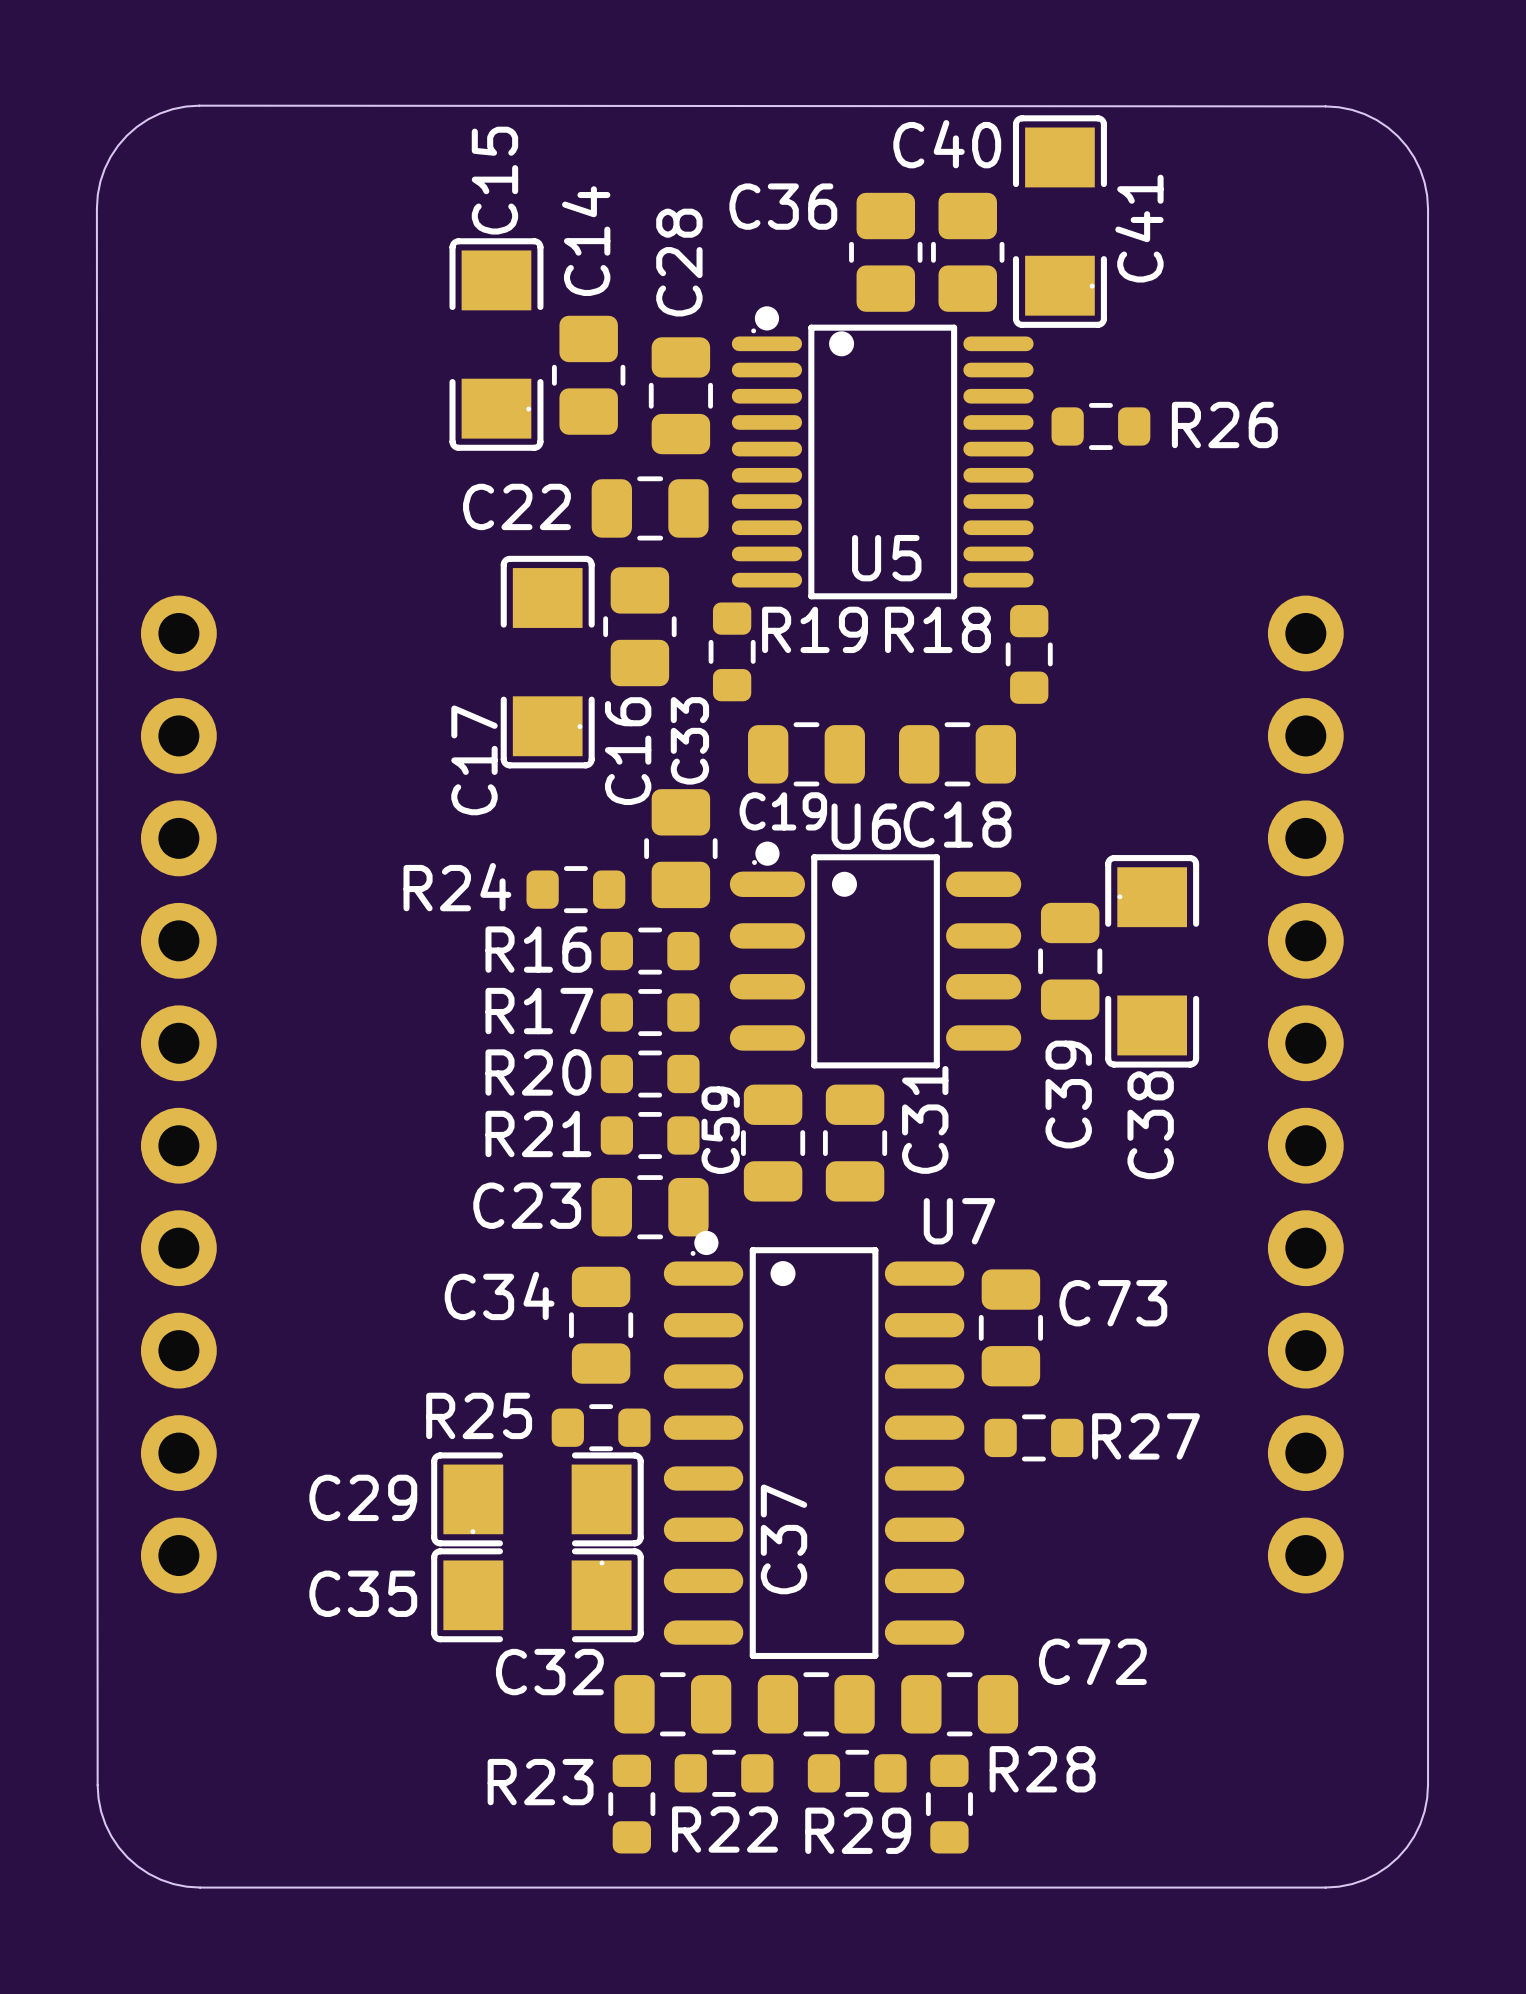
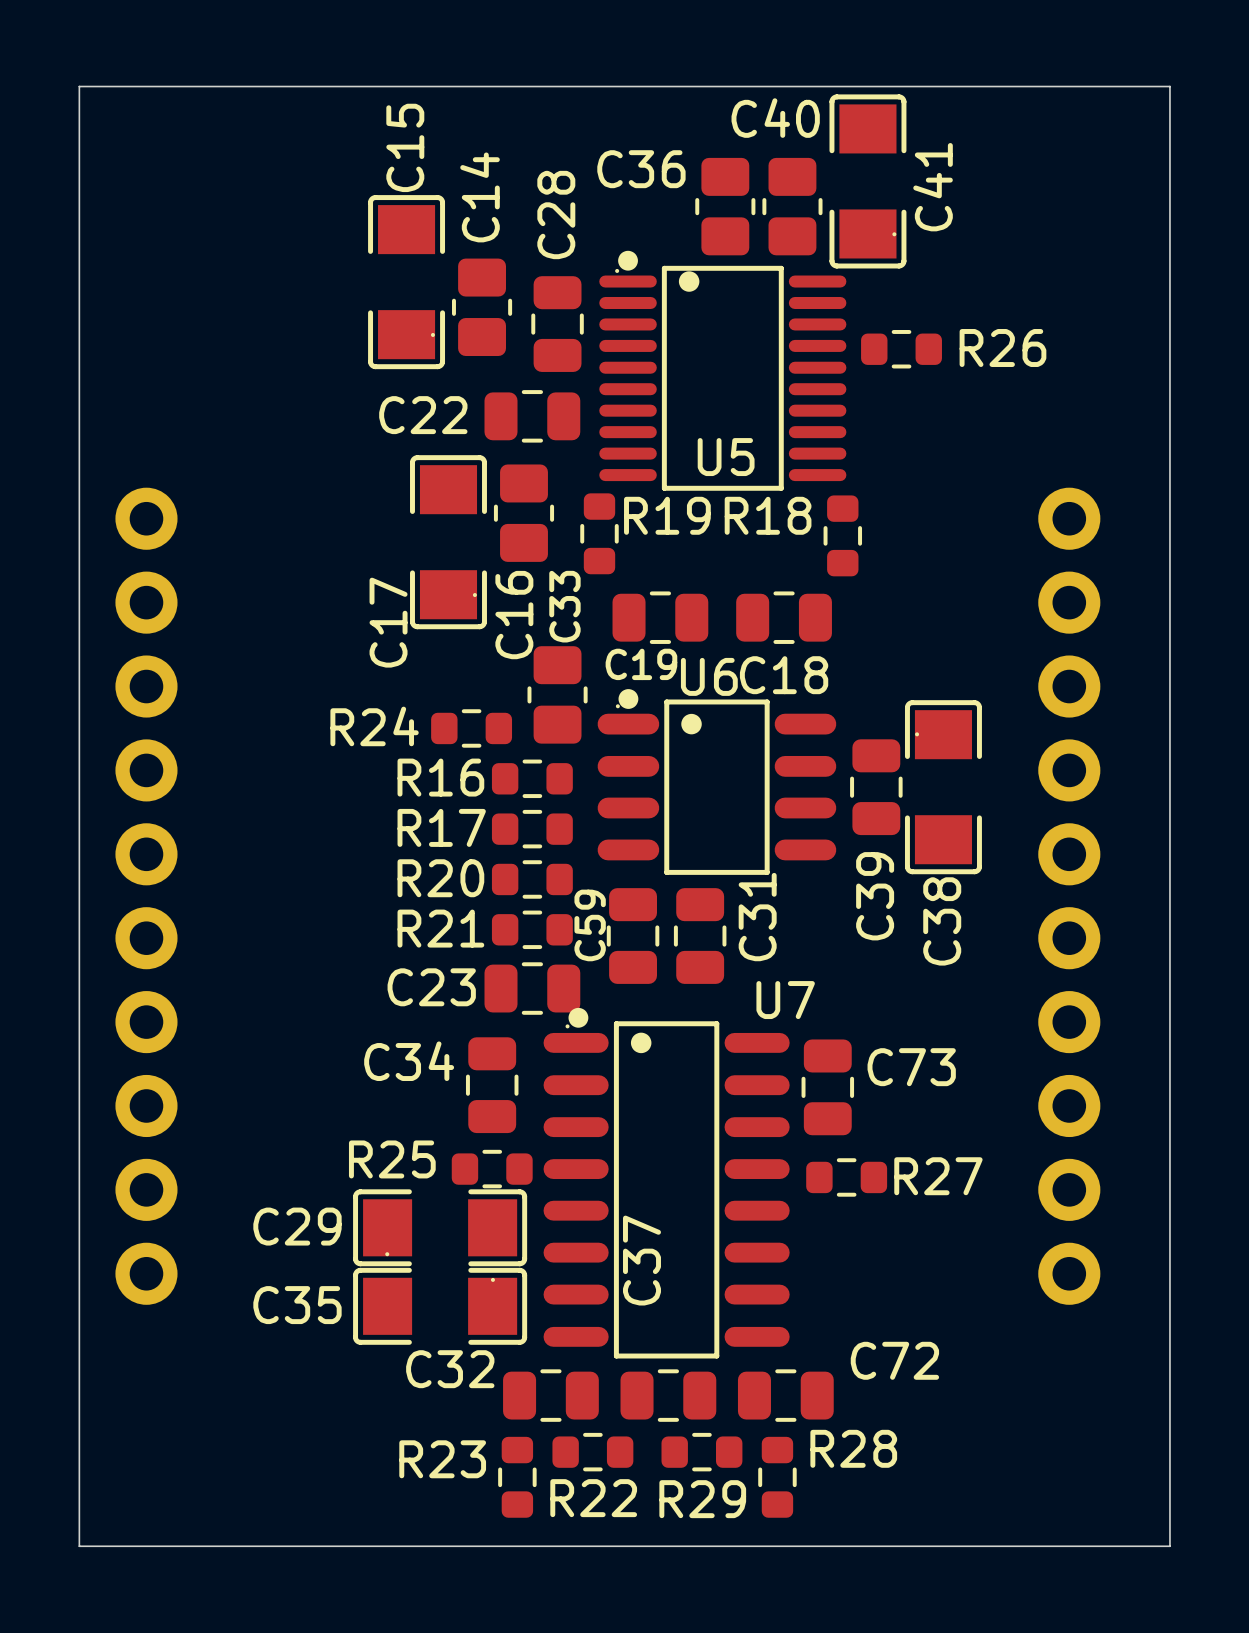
board edge: (199, 105) (1325, 106) (1338, 107) (1364, 114) (1387, 127) (1406, 146) (1420, 169) (1424, 182) (1428, 208) (1428, 1785) (1427, 1798) (1420, 1824) (1406, 1847) (1387, 1866) (1376, 1873) (1352, 1884) (1325, 1887) (200, 1887) (186, 1886) (160, 1879) (137, 1866) (118, 1847) (105, 1824) (101, 1811) (97, 1785) (96, 208) (97, 194) (104, 168) (110, 156) (126, 135) (148, 119) (160, 113) (185, 106) (199, 105) -> (79, 86) (79, 1546) (1169, 1546) (1169, 86) (79, 86)

